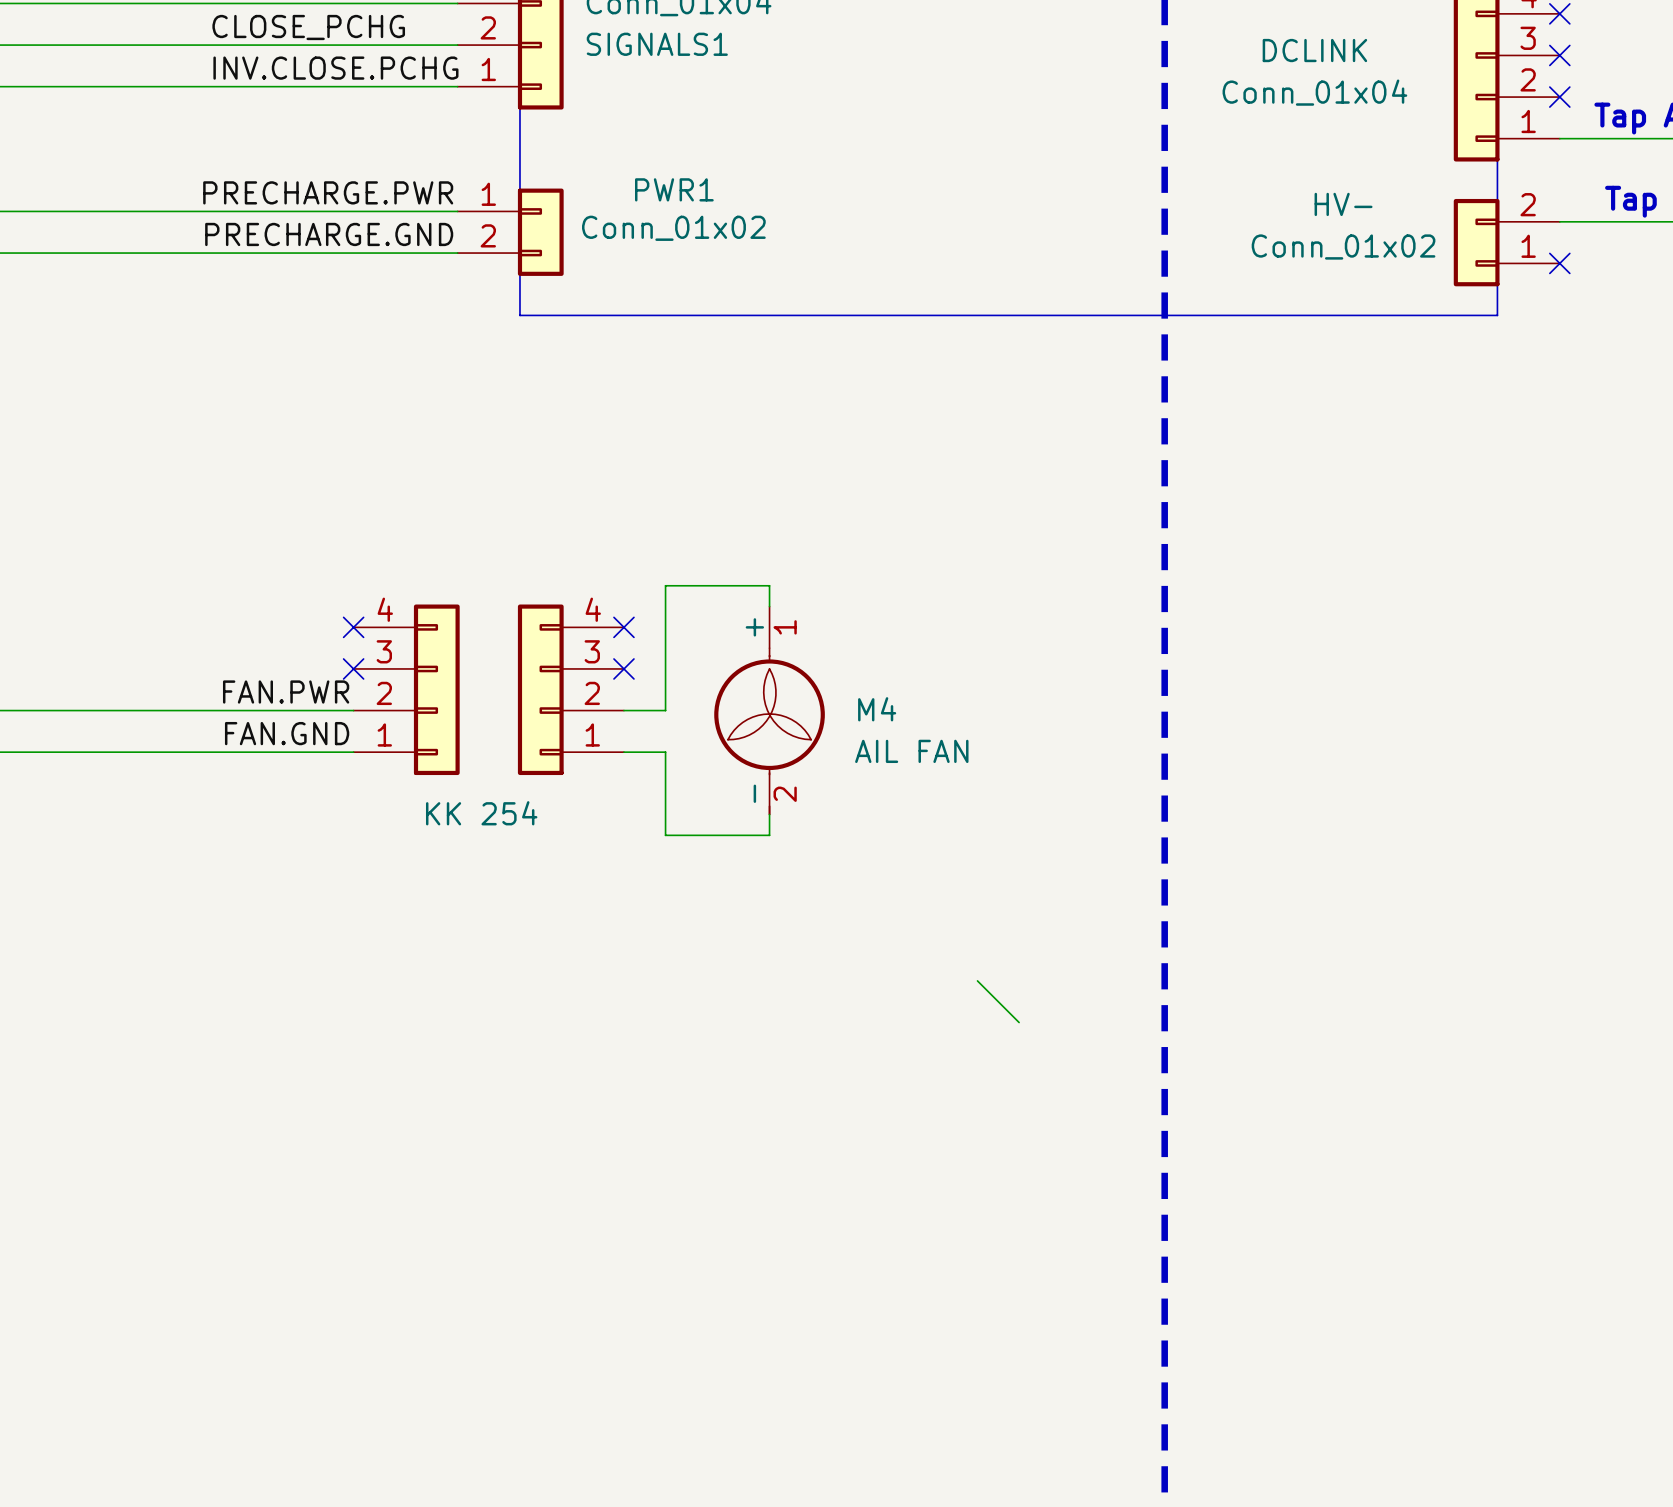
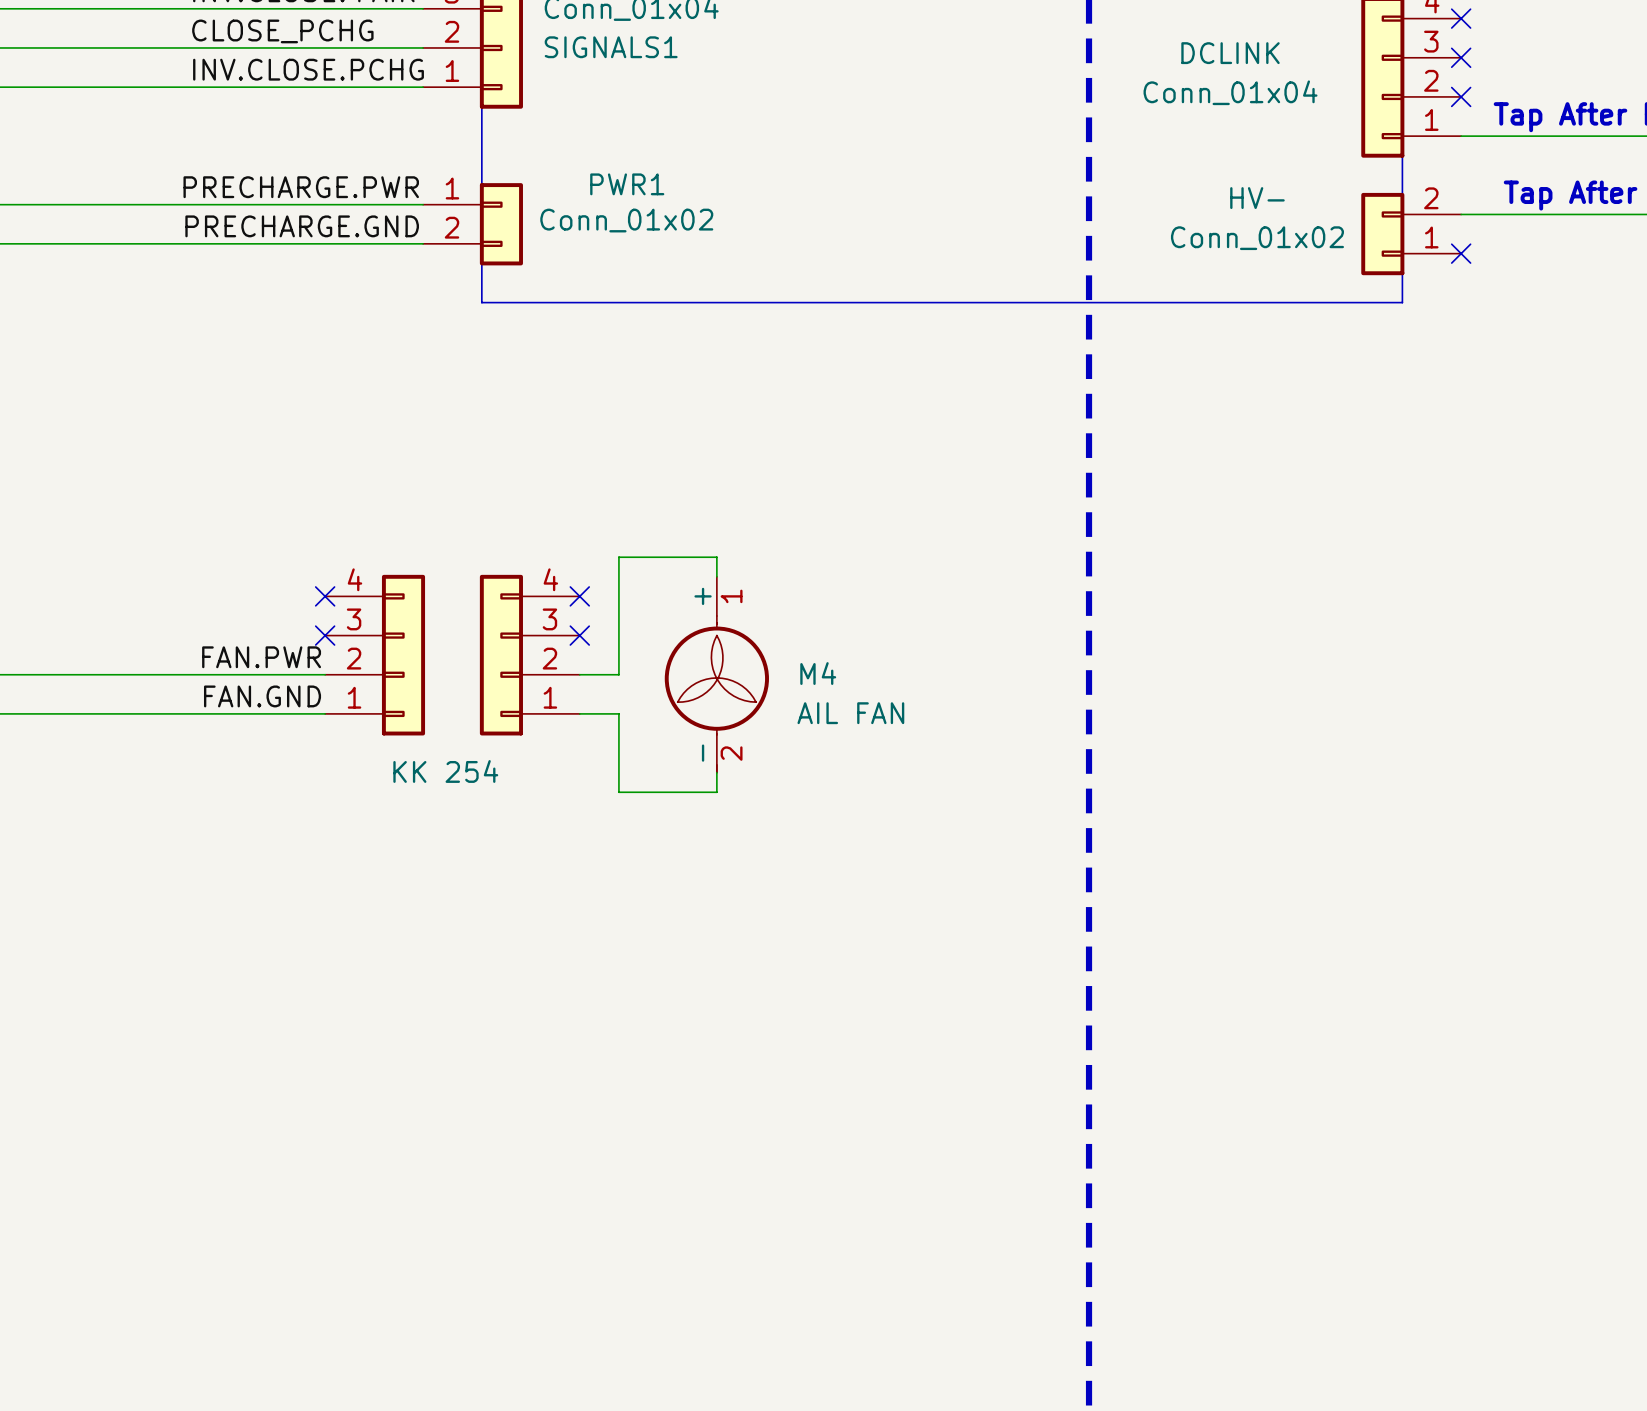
wire: (977, 980) (1019, 1022) -> none

